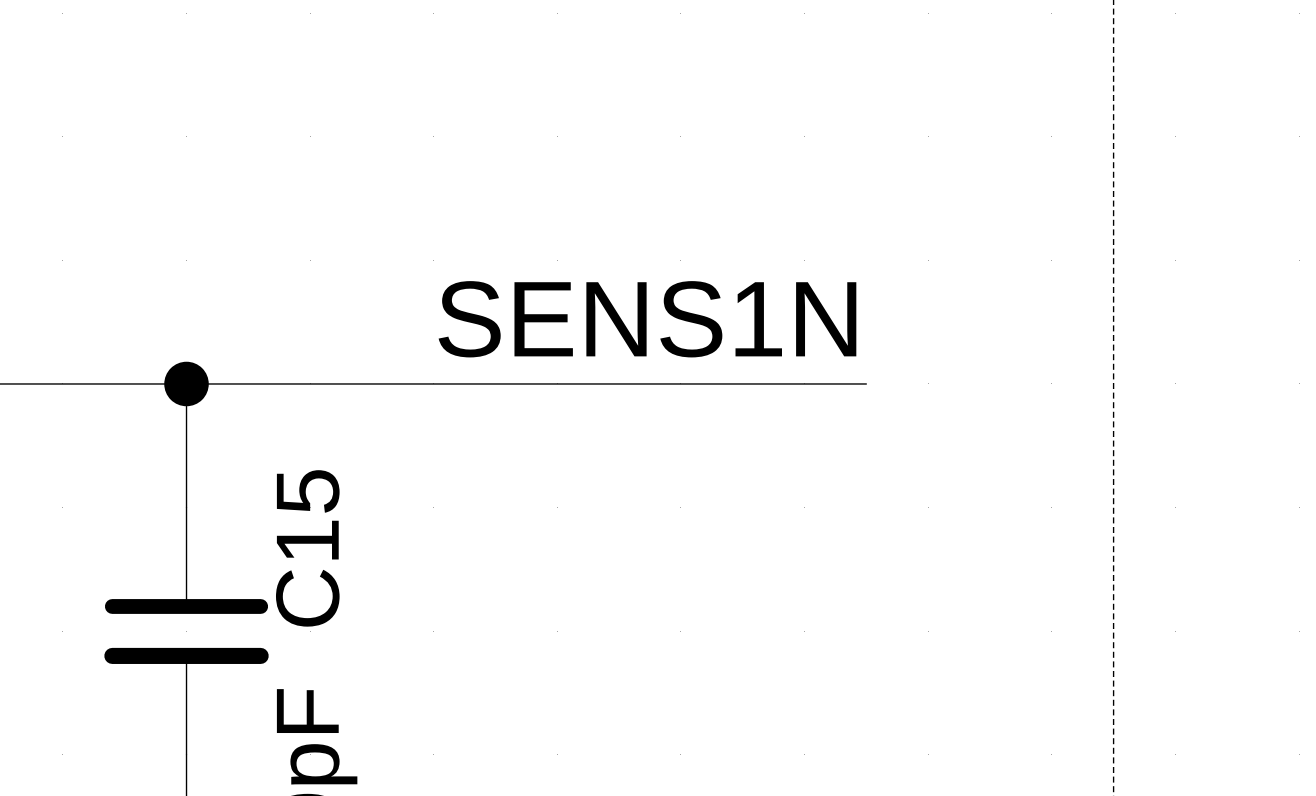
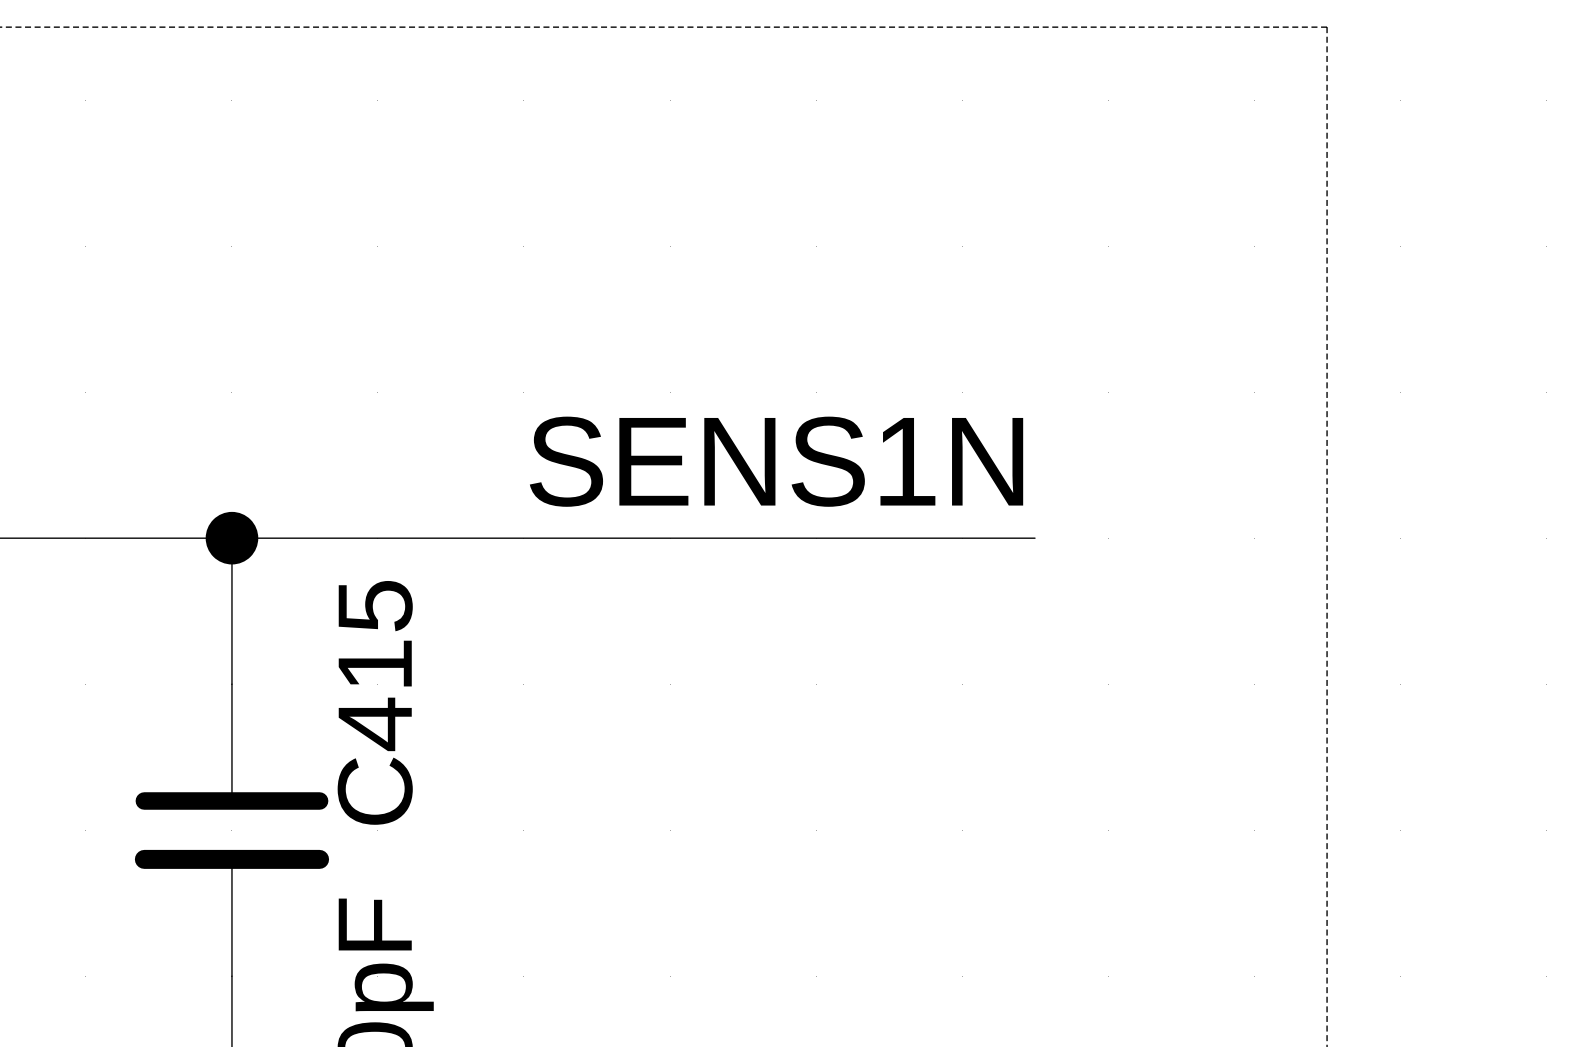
C15 name: C15 (307, 548) -> C415 (375, 702)

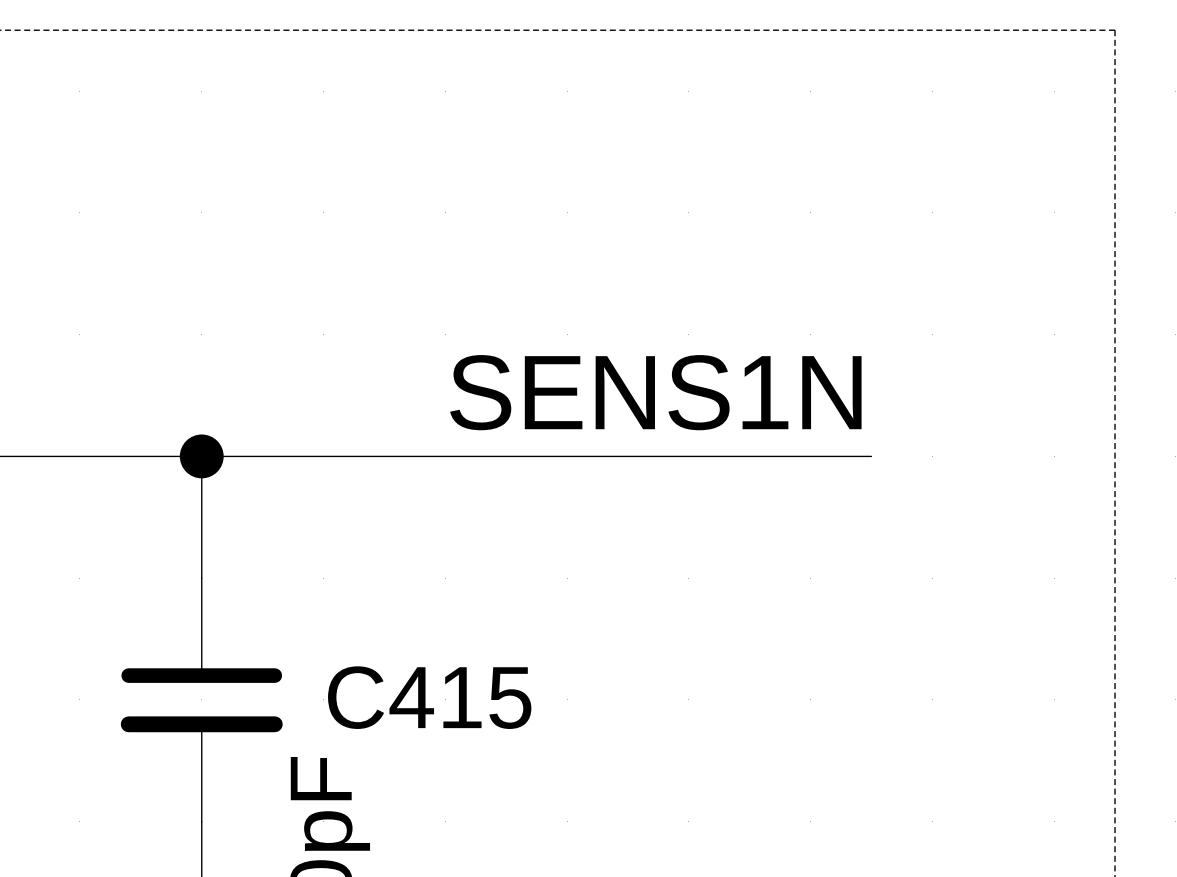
C415 name rotation: 0° (375, 702) -> 90° clockwise (429, 697)

